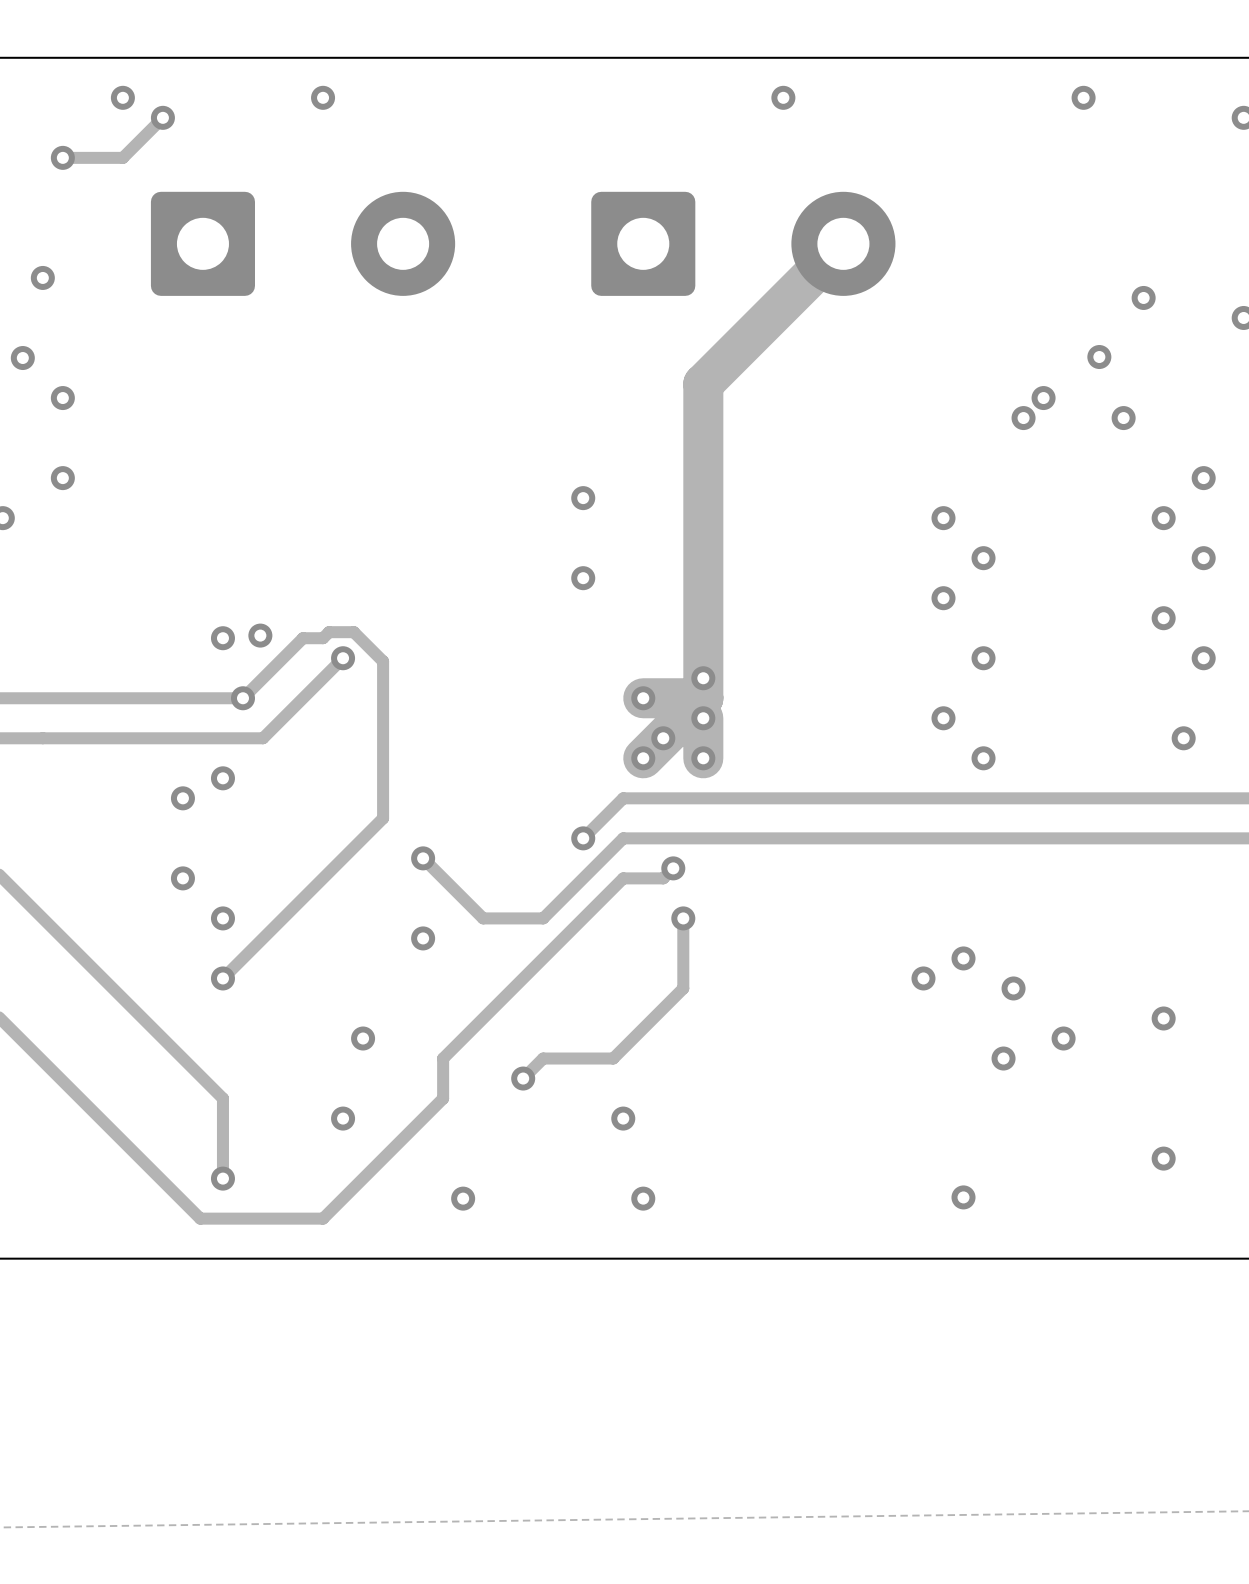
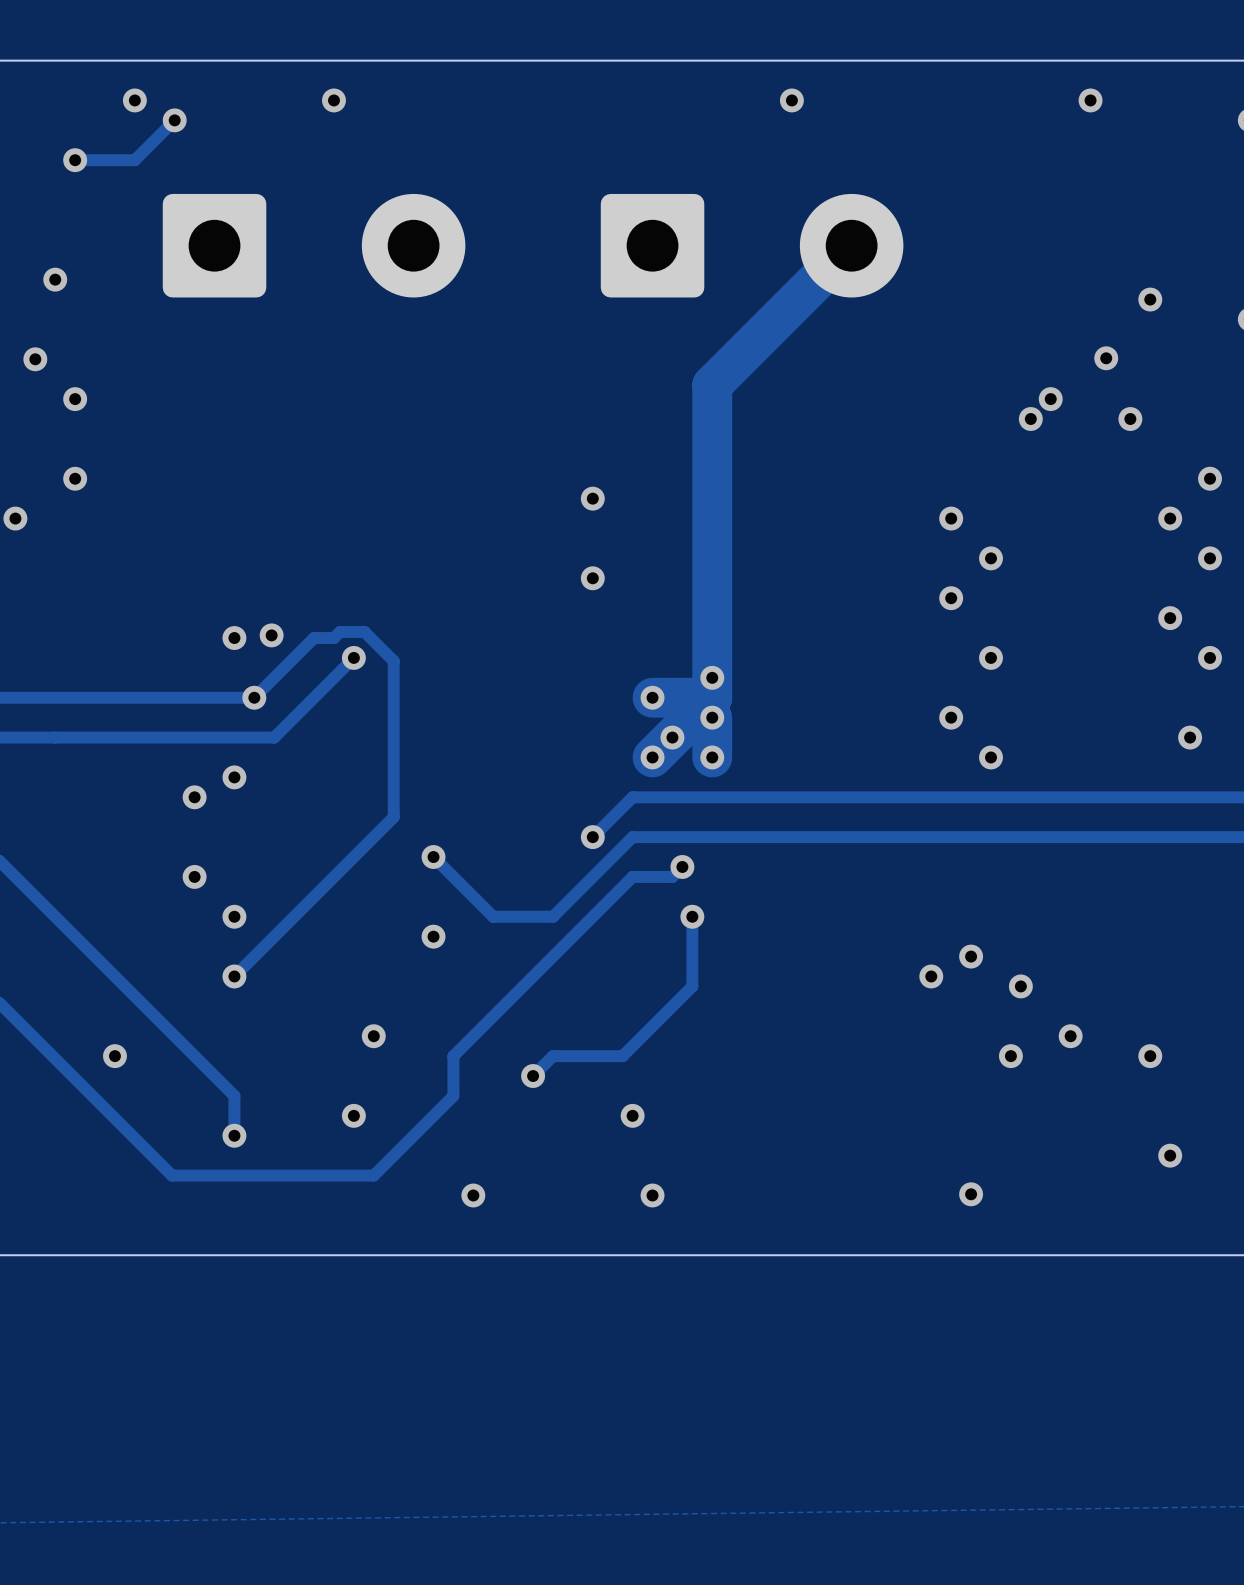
via position: (1163, 1018) -> (1150, 1056)
via: none -> (114, 1056)
track: (222, 1138) (222, 1178) -> none
via position: (222, 1178) -> (234, 1135)
track: (363, 1178) (323, 1218) (200, 1218) (160, 1178) -> (373, 1175) (172, 1175)

